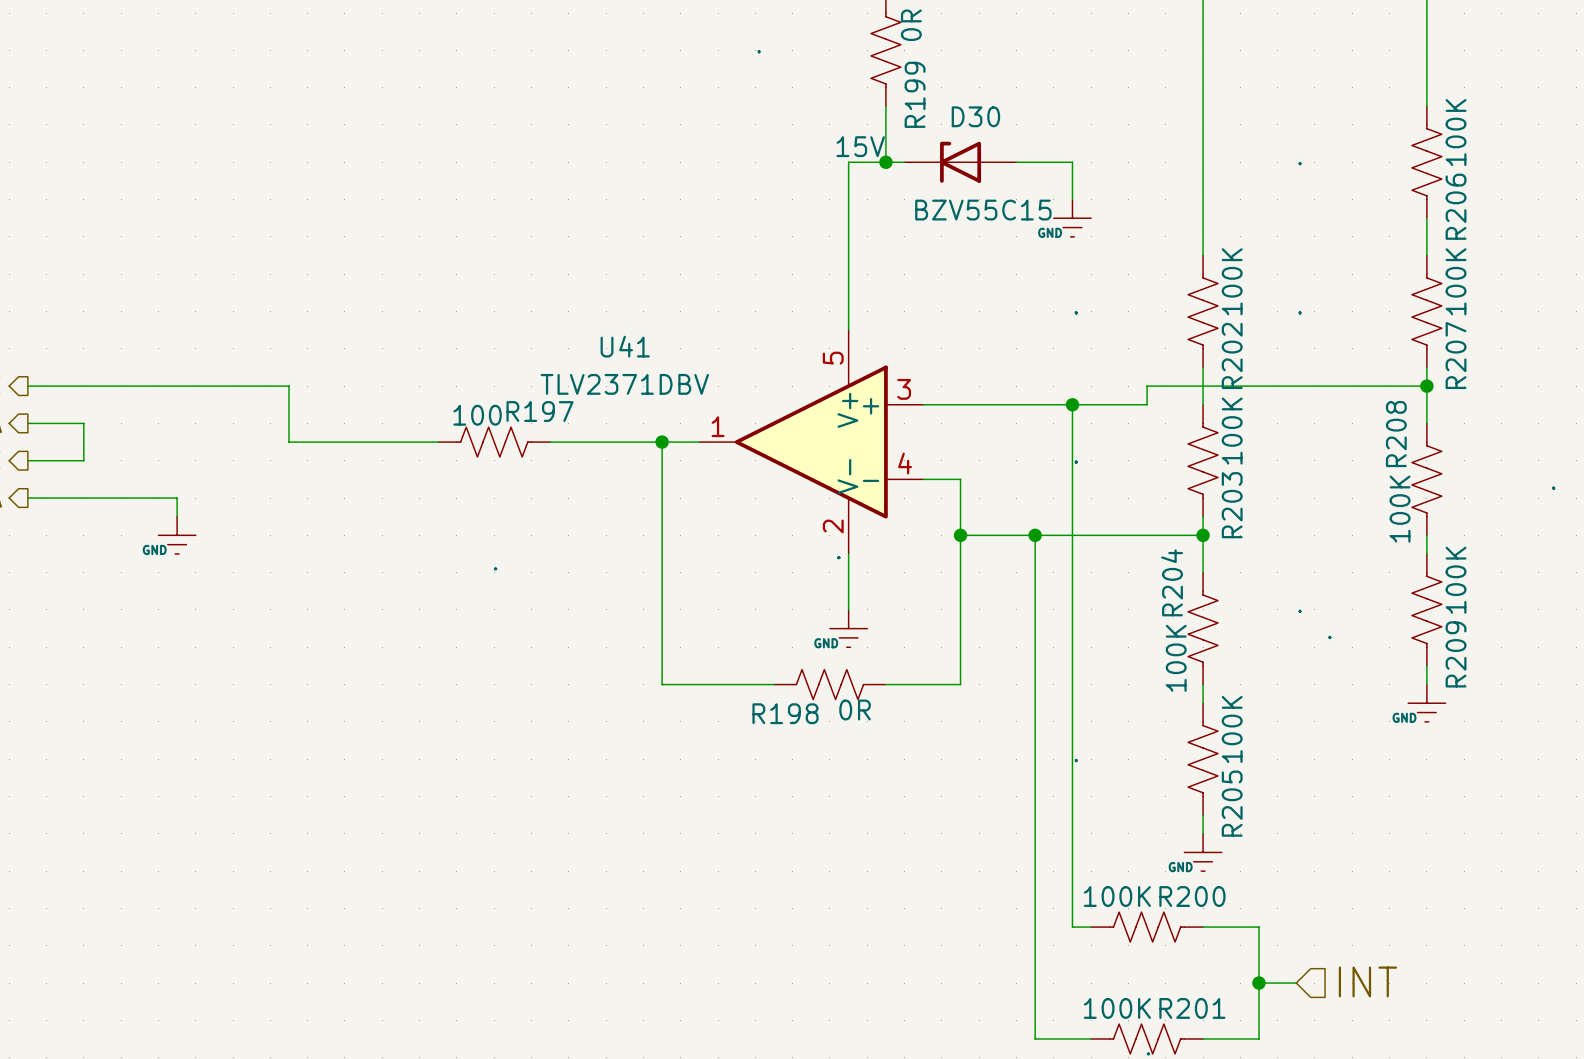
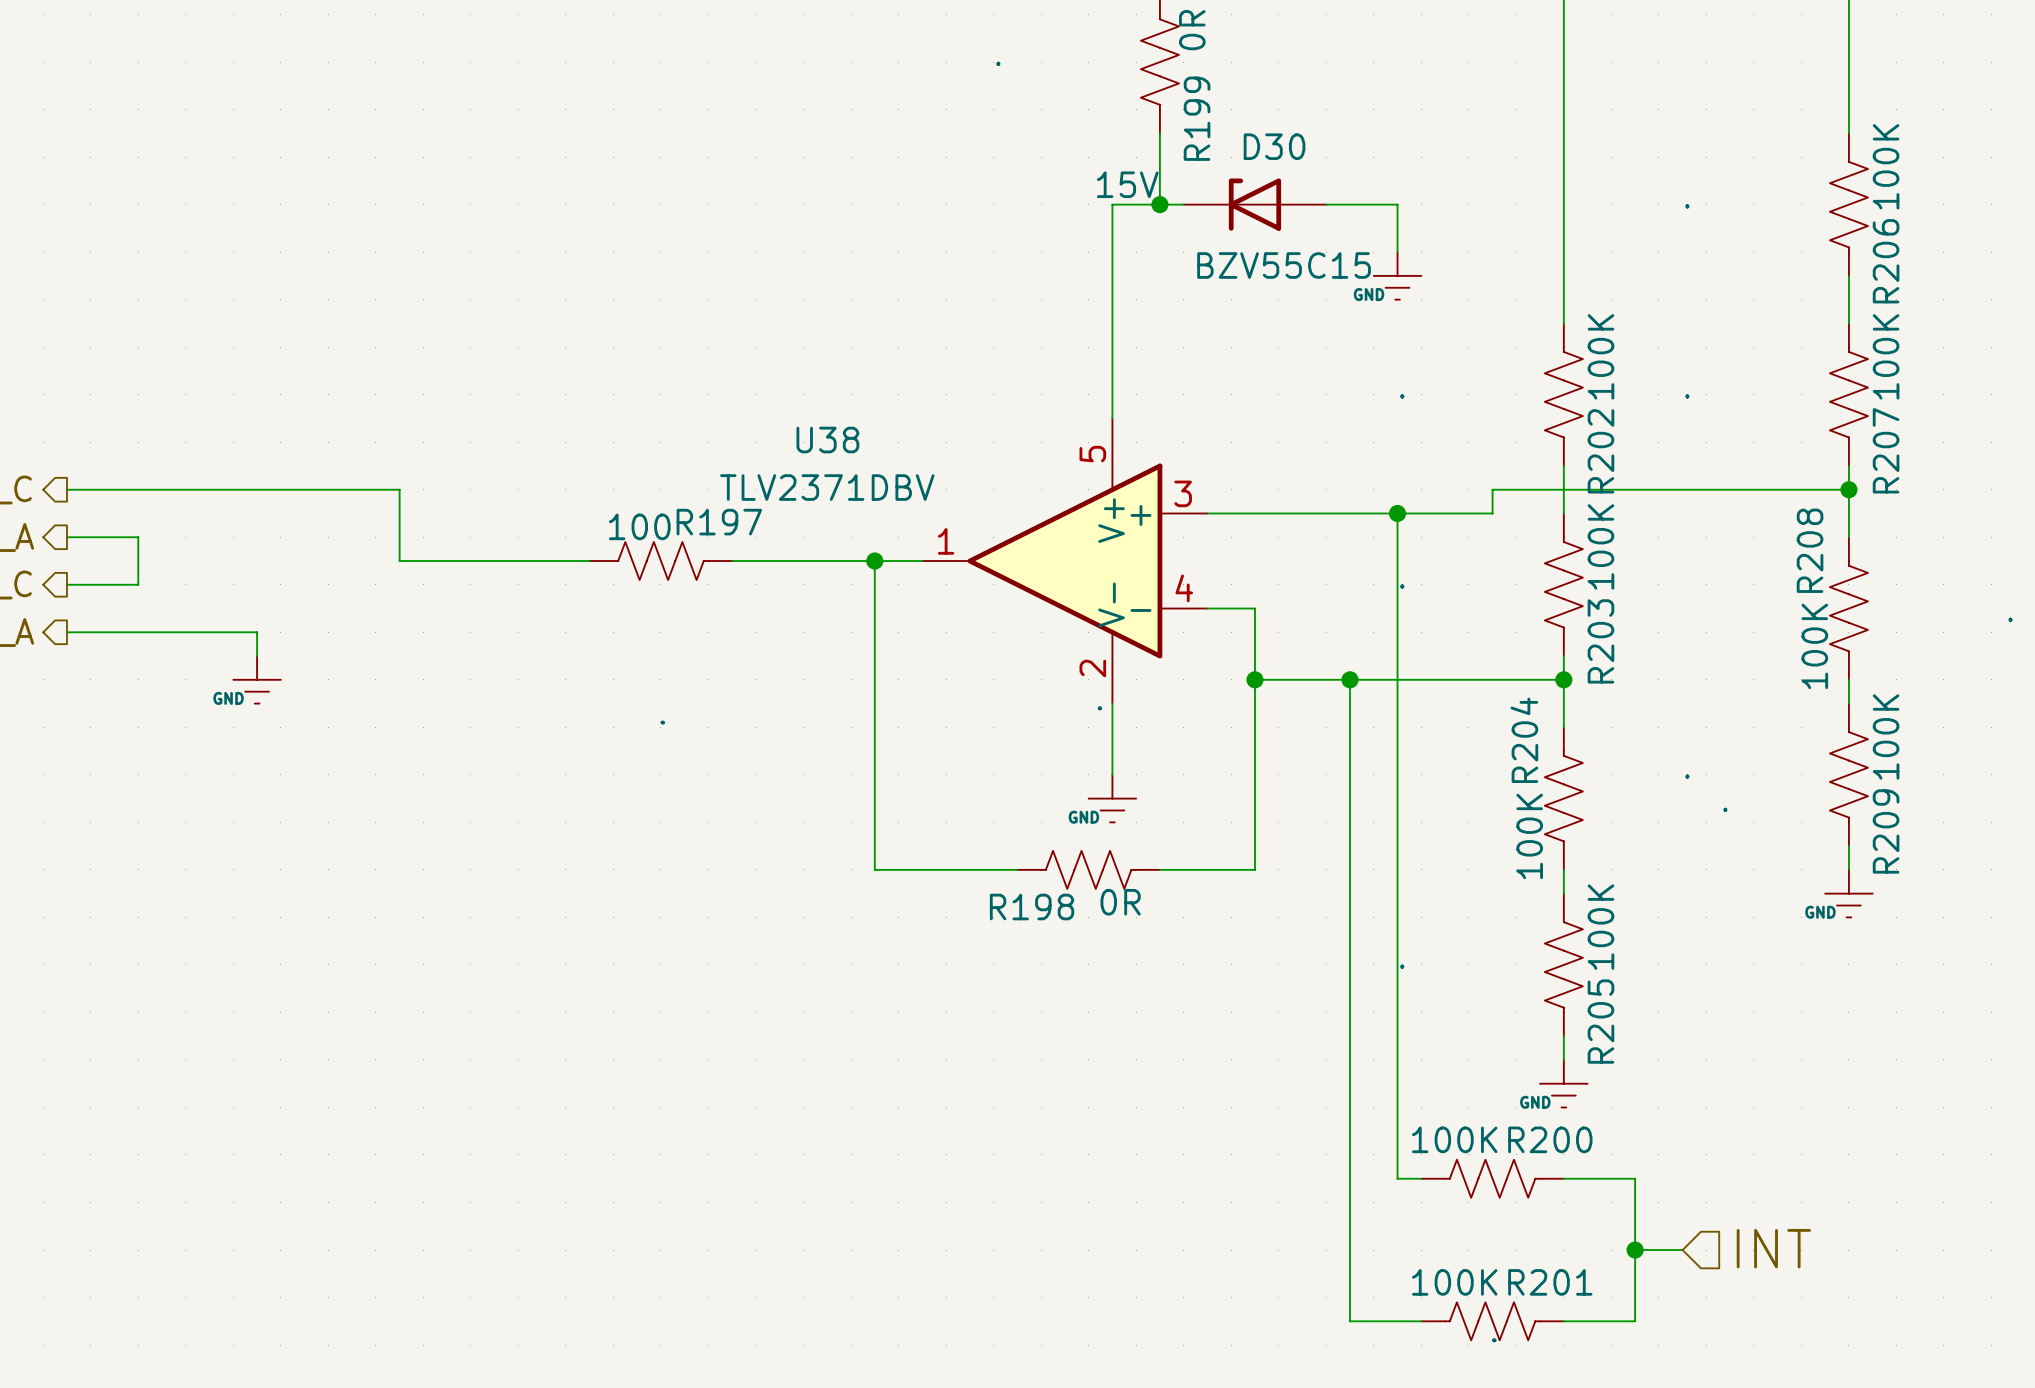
U41 name: U41 (625, 346) -> U38 (827, 440)

